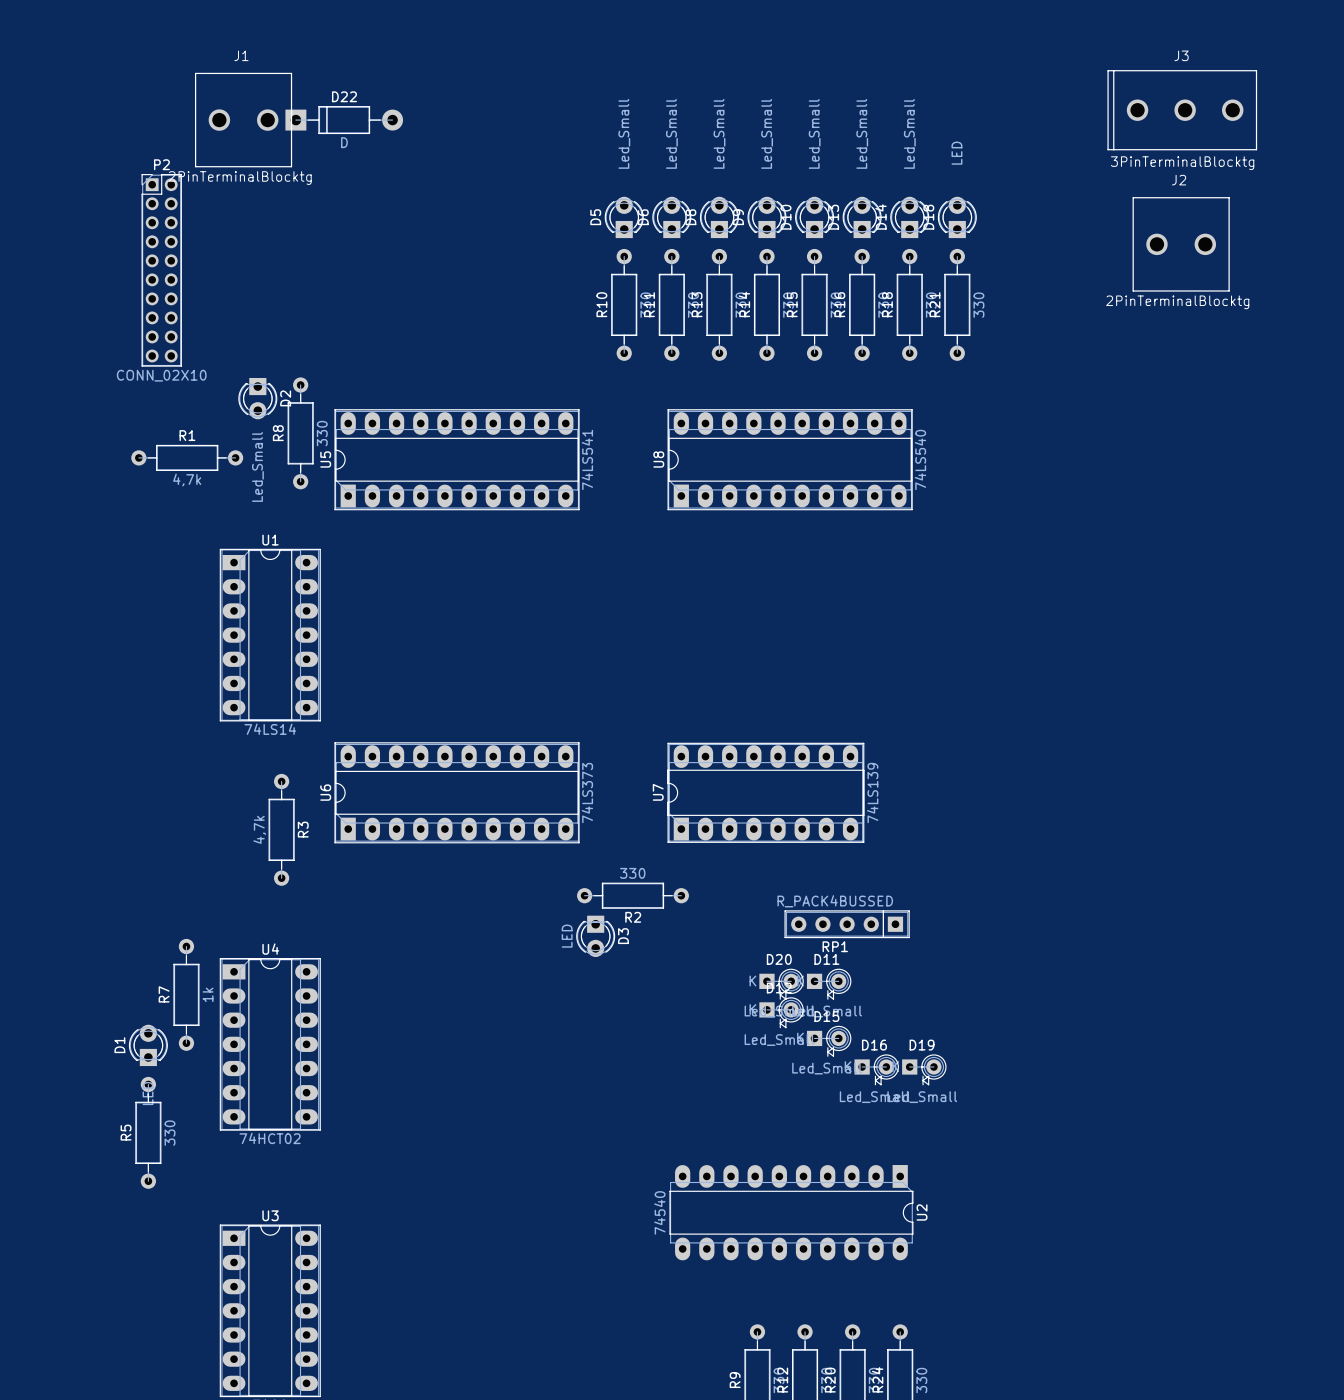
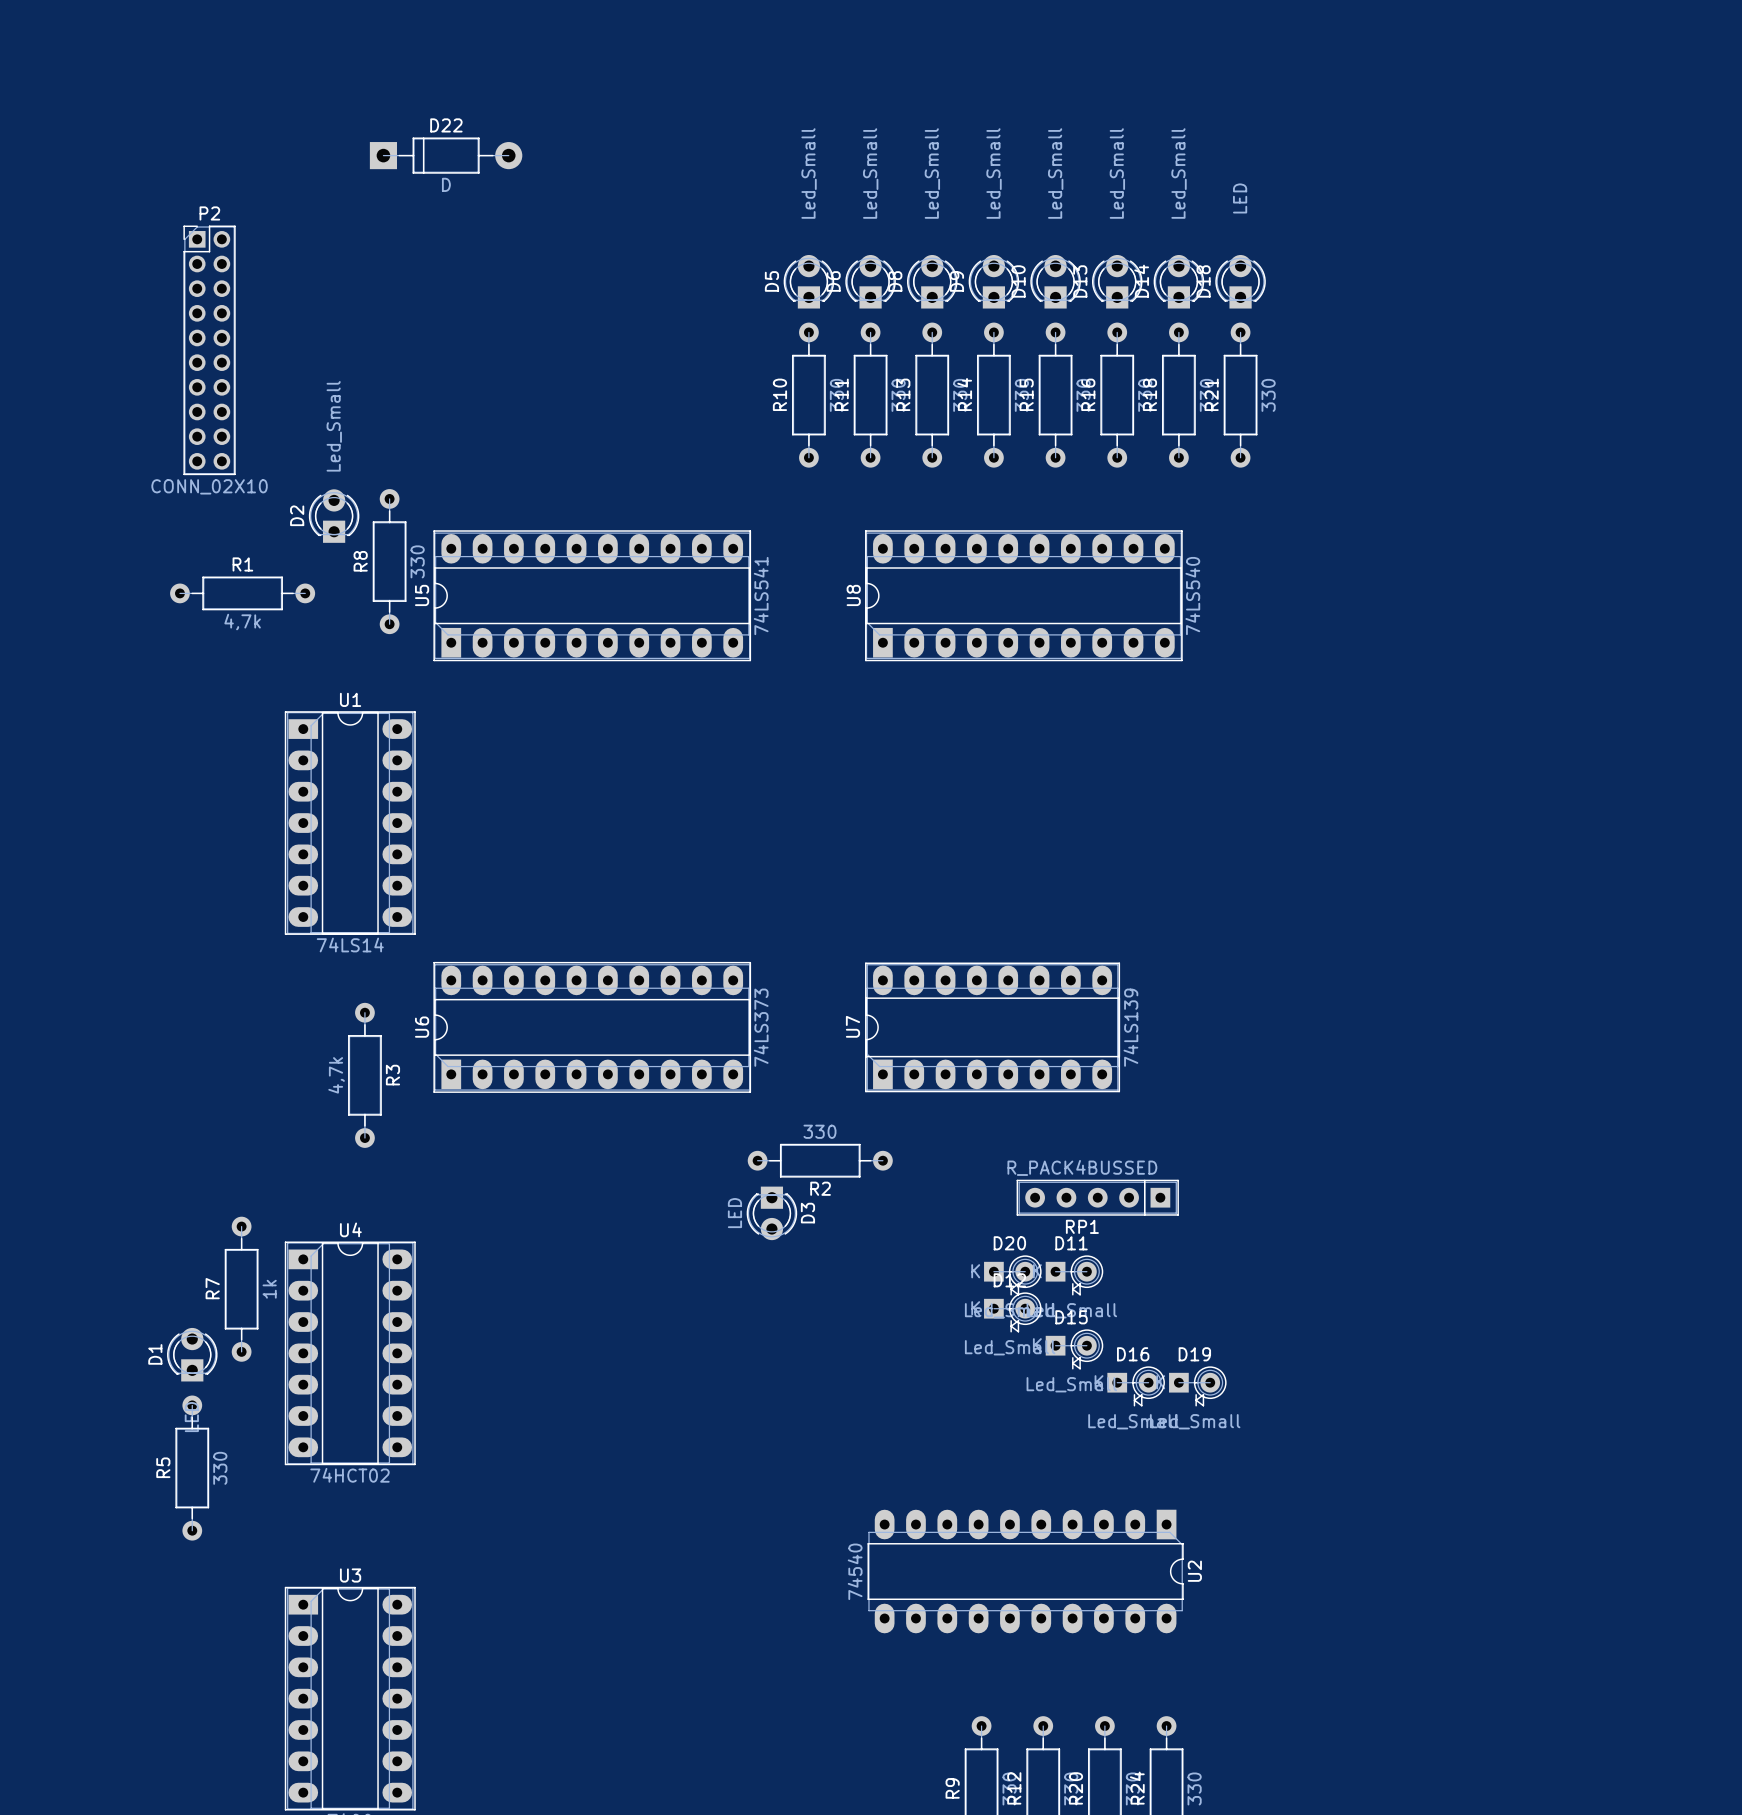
J3: 3PinTerminalBlocktg (1182, 110) -> none
J1: 2PinTerminalBlocktg (243, 120) -> none
J2: 2PinTerminalBlocktg (1181, 244) -> none
D2 rotation: 0° (257, 398) -> 180° (334, 516)

